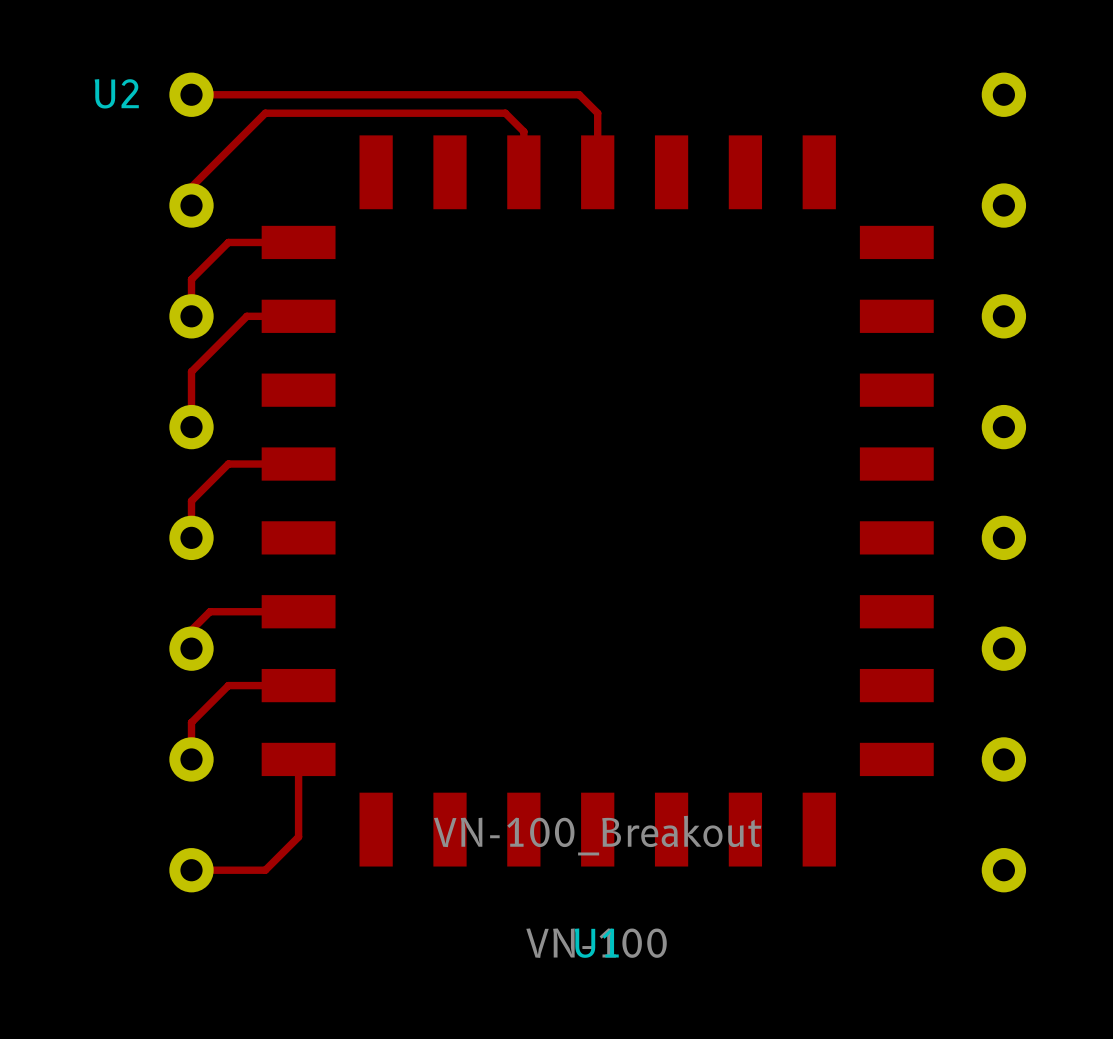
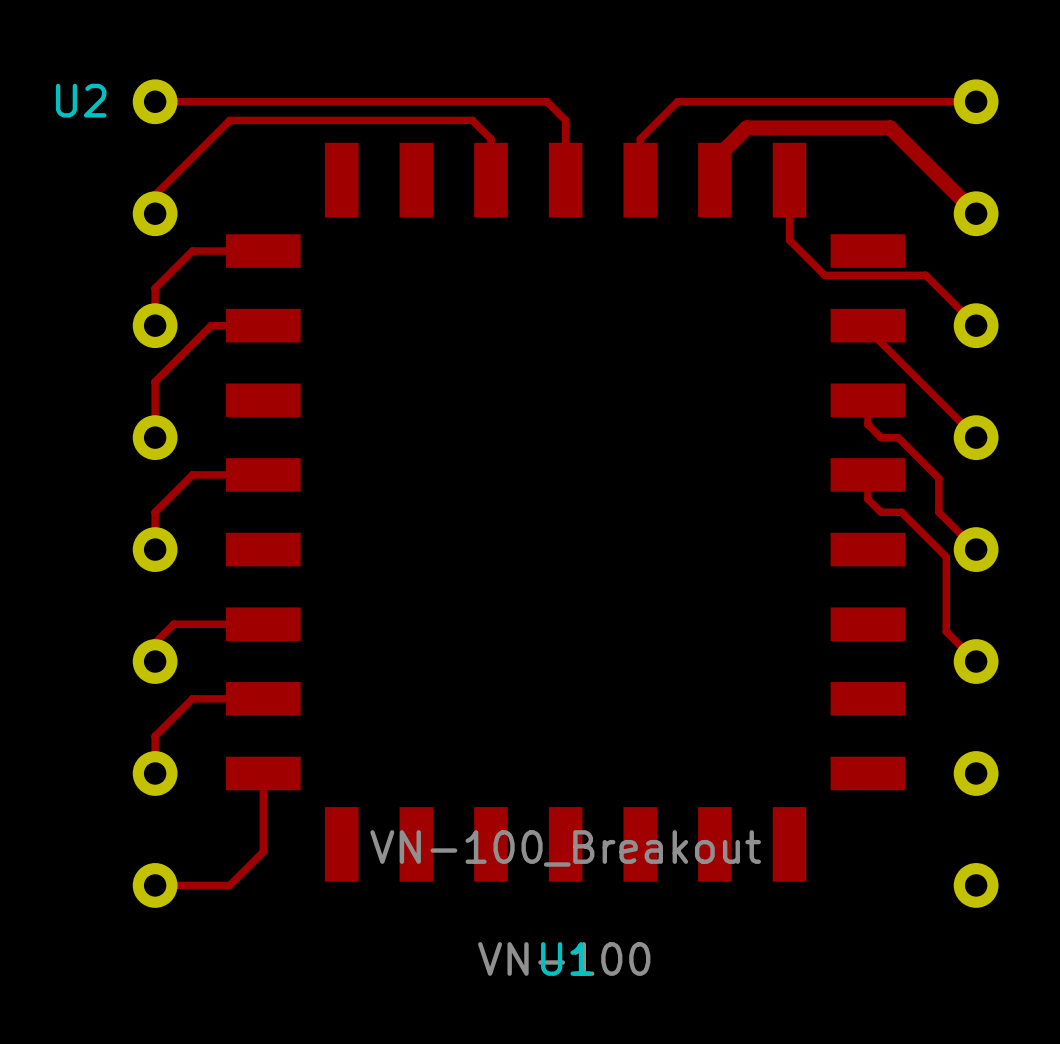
track: none -> (976, 101) (677, 101) (640, 139) (640, 180)
track: none -> (714, 180) (714, 159) (746, 127) (890, 127) (976, 213)
track: none -> (789, 180) (789, 240) (824, 275) (925, 275) (976, 325)
track: none -> (867, 325) (867, 329) (976, 437)
track: none -> (867, 400) (867, 424) (880, 437) (898, 437) (938, 478) (938, 512) (976, 549)
track: none -> (867, 474) (867, 499) (880, 512) (901, 512) (946, 557) (946, 631) (976, 661)

